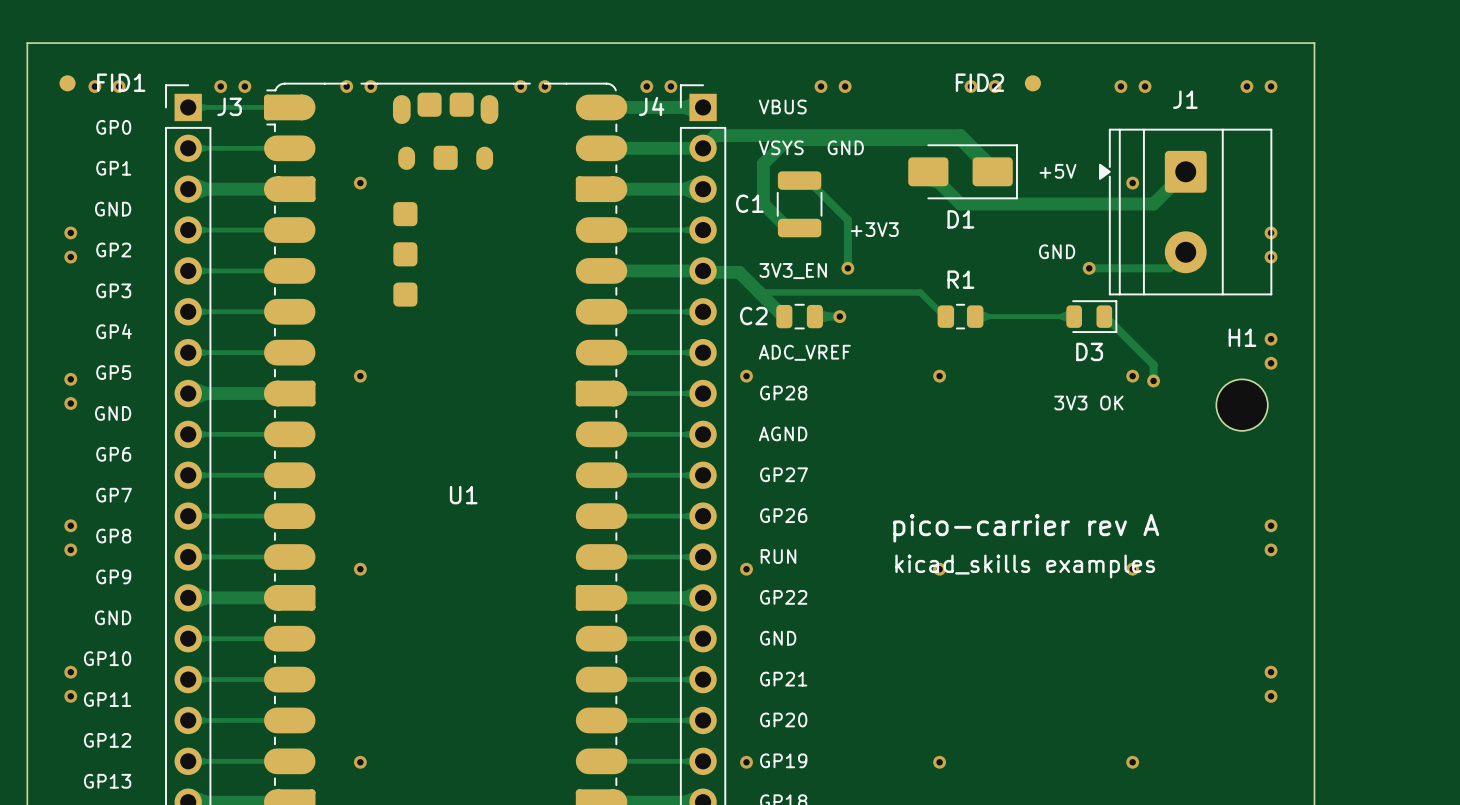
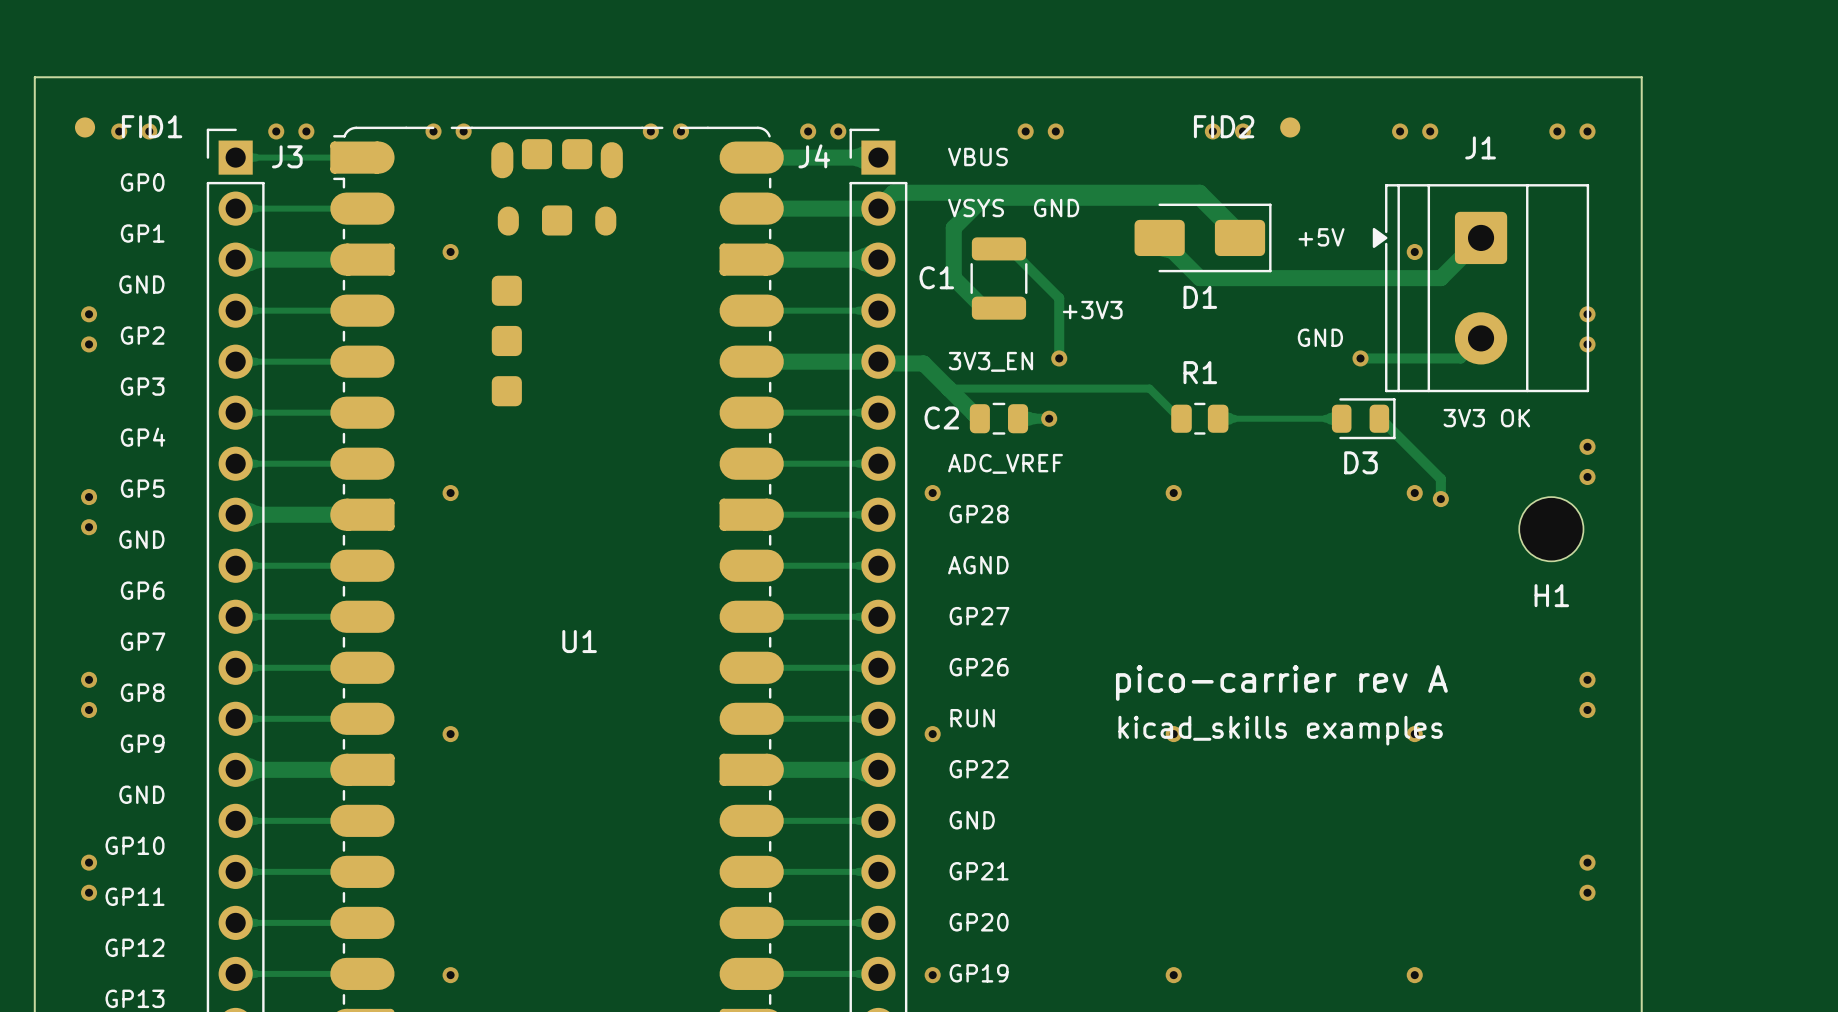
H1 name position: H1 (1242, 337) -> H1 (1551, 595)
text position: 3V3 OK (1088, 403) -> 3V3 OK (1486, 418)

